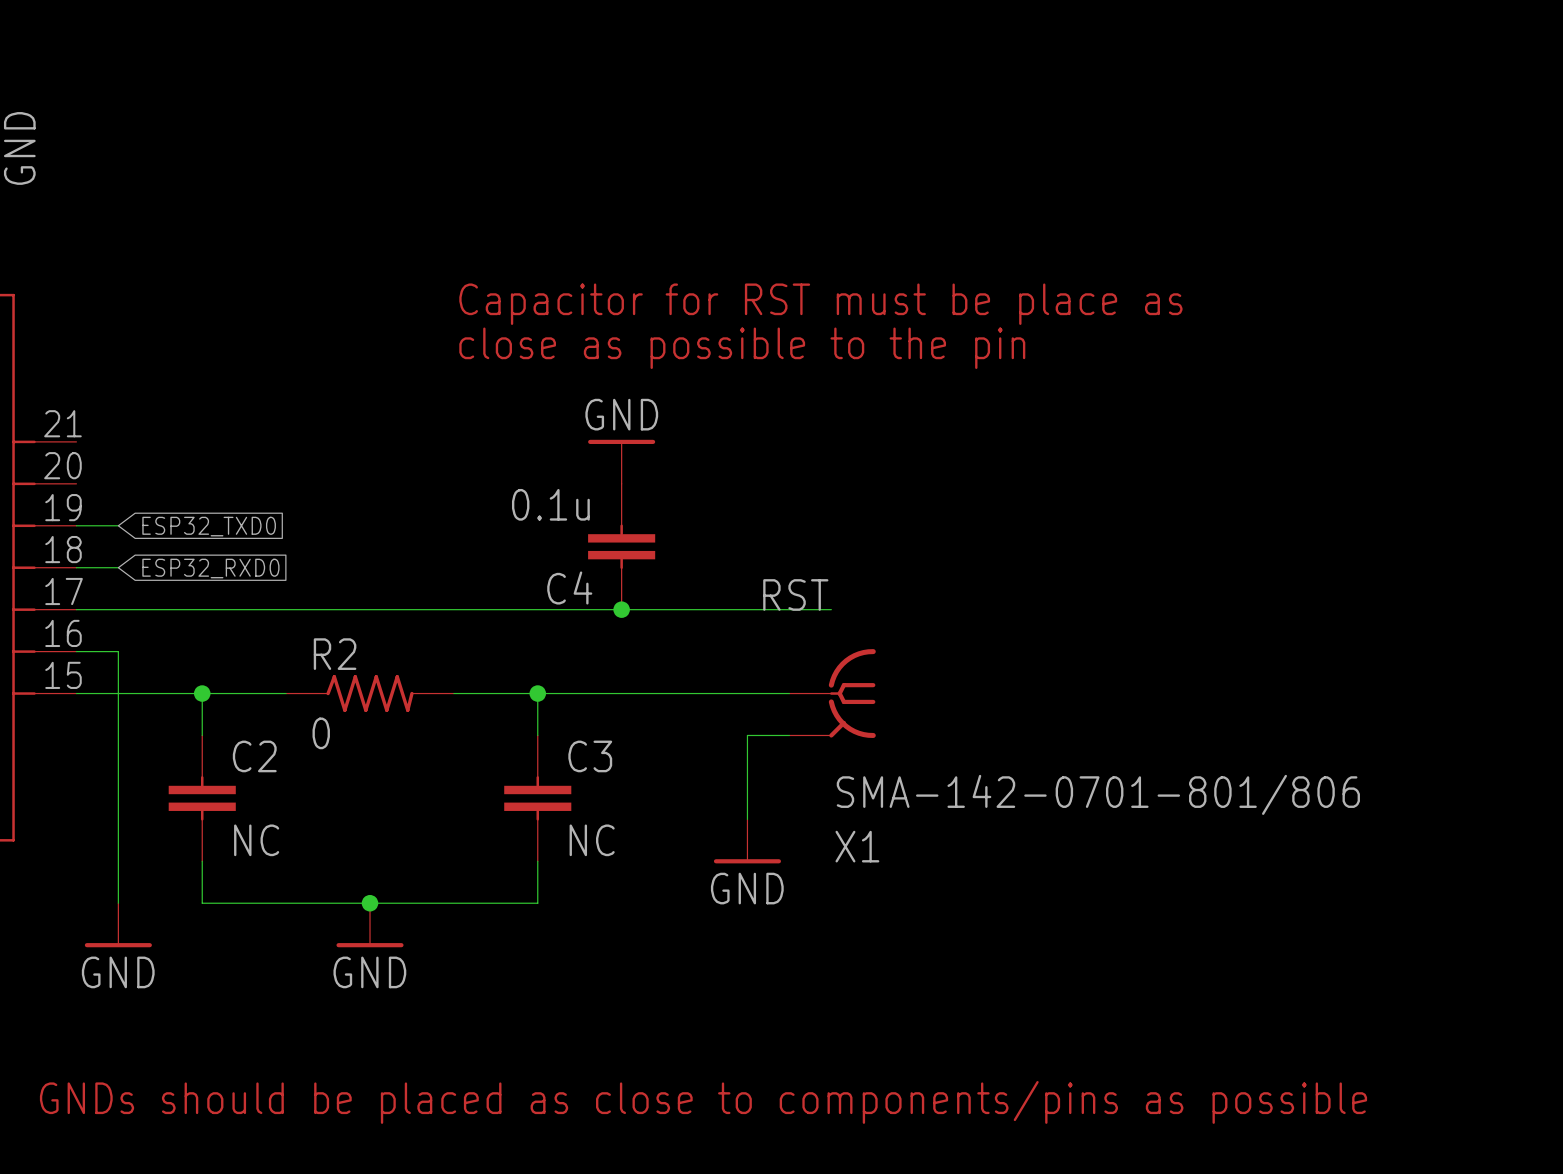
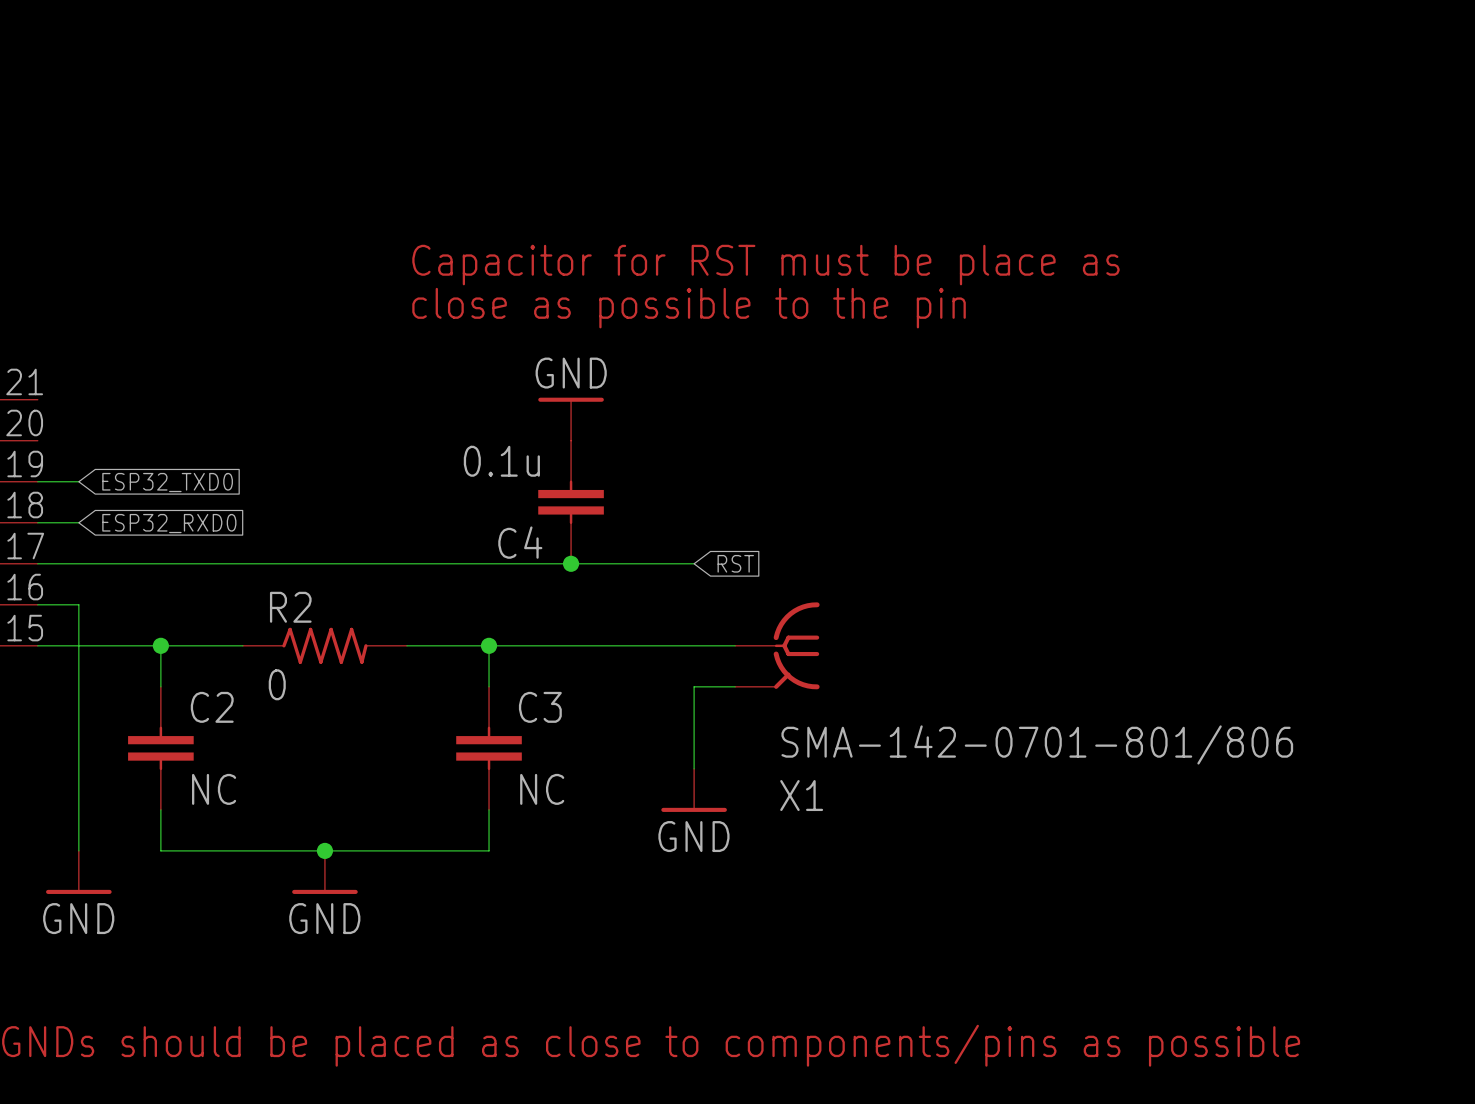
label: RST (795, 594) -> none
wire: (747, 609) (831, 609) -> none
global label: none -> RST (735, 563)

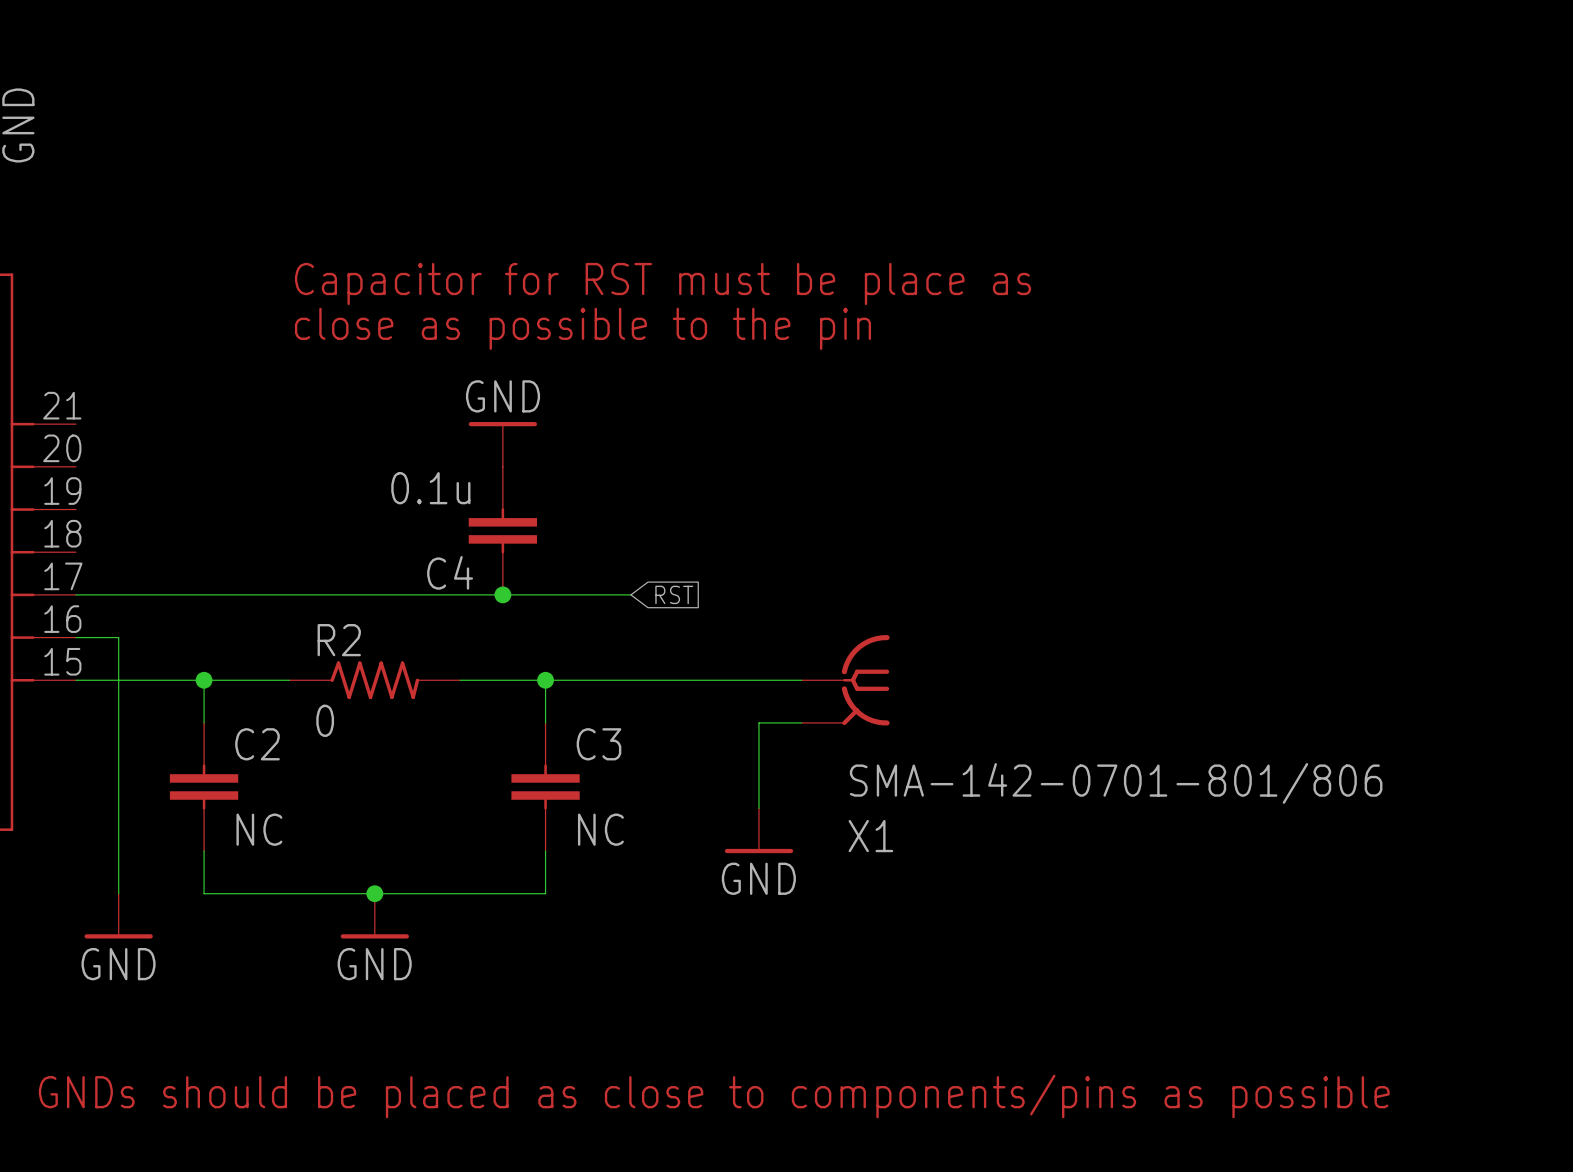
text position: Capacitor for RST must be place as (765, 265) -> Capacitor for RST must be place as (663, 283)
text position: close as possible to the pin (689, 308) -> close as possible to the pin (582, 328)
power symbol position: GND (571, 419) -> GND (502, 444)
wire: (37, 481) (78, 481) -> none
global label: ESP32_TXD0 (167, 482) -> none
C4 position: (571, 502) -> (502, 530)
wire: (37, 522) (78, 522) -> none
global label: ESP32_RXD0 (169, 523) -> none
junction: none -> (502, 594)
wire: (571, 563) (694, 563) -> none
junction: (571, 563) -> none
global label position: RST (735, 563) -> RST (674, 594)

